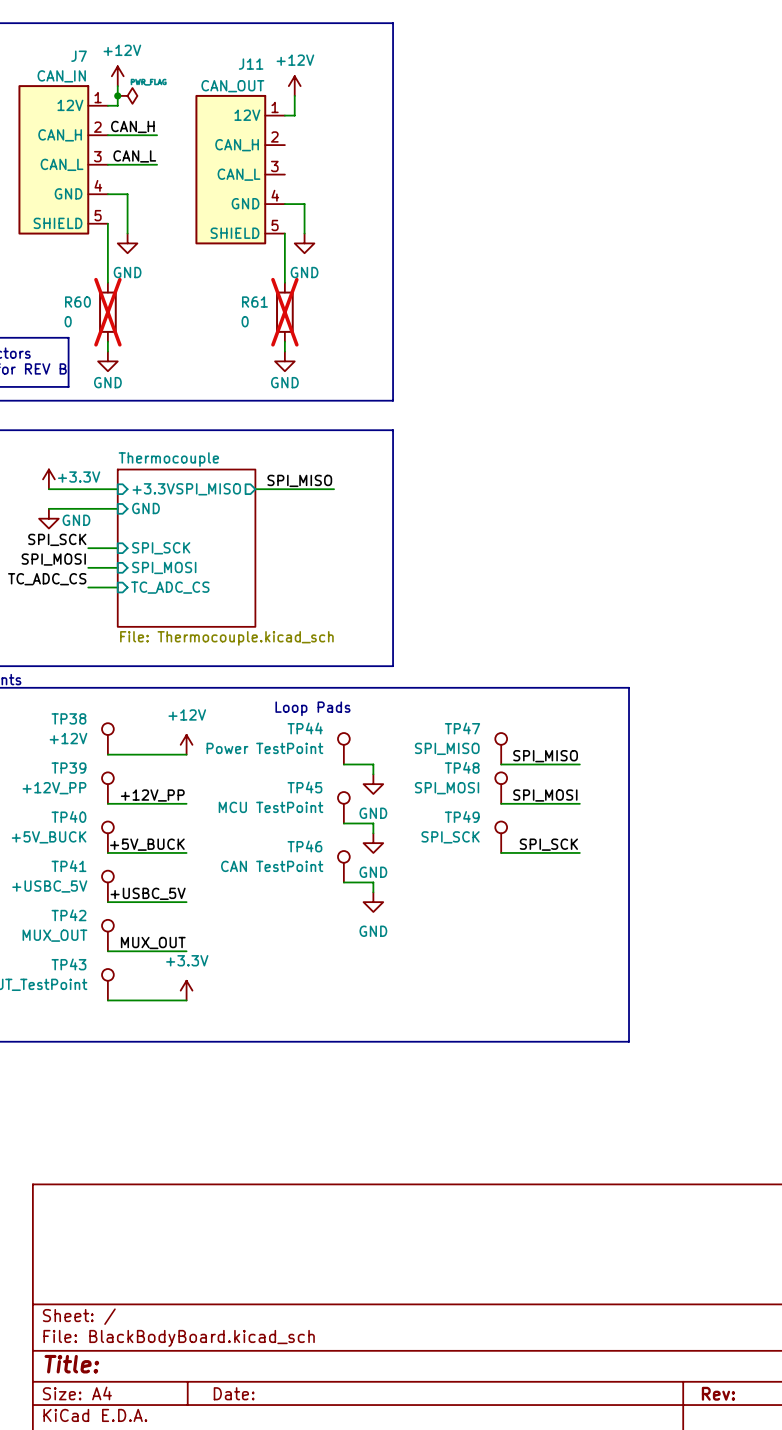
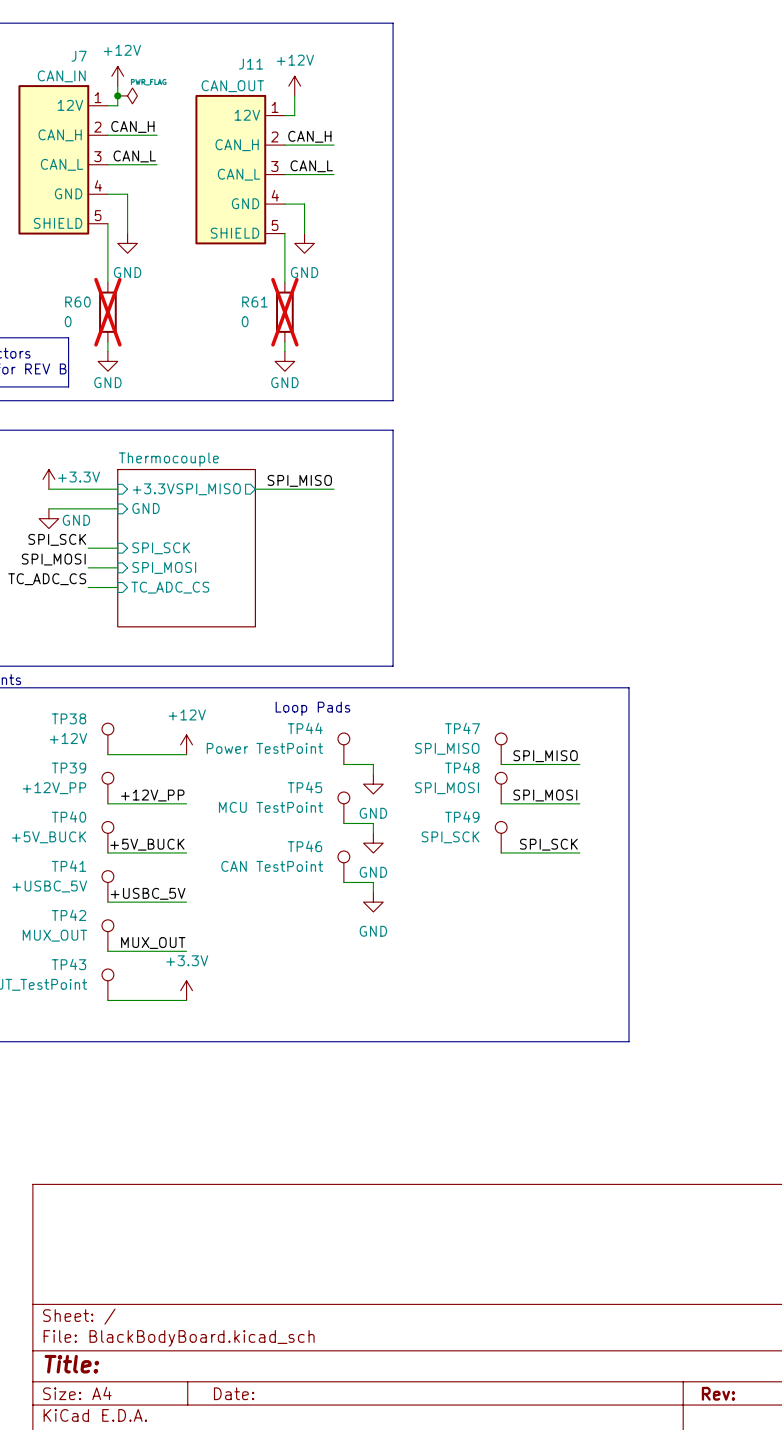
label: none -> CAN_H (309, 136)
wire: none -> (284, 145) (334, 145)
label: none -> CAN_L (311, 166)
wire: none -> (284, 174) (334, 174)
sheet Thermocouple value: File: Thermocouple.kicad_sch (226, 638) -> none

